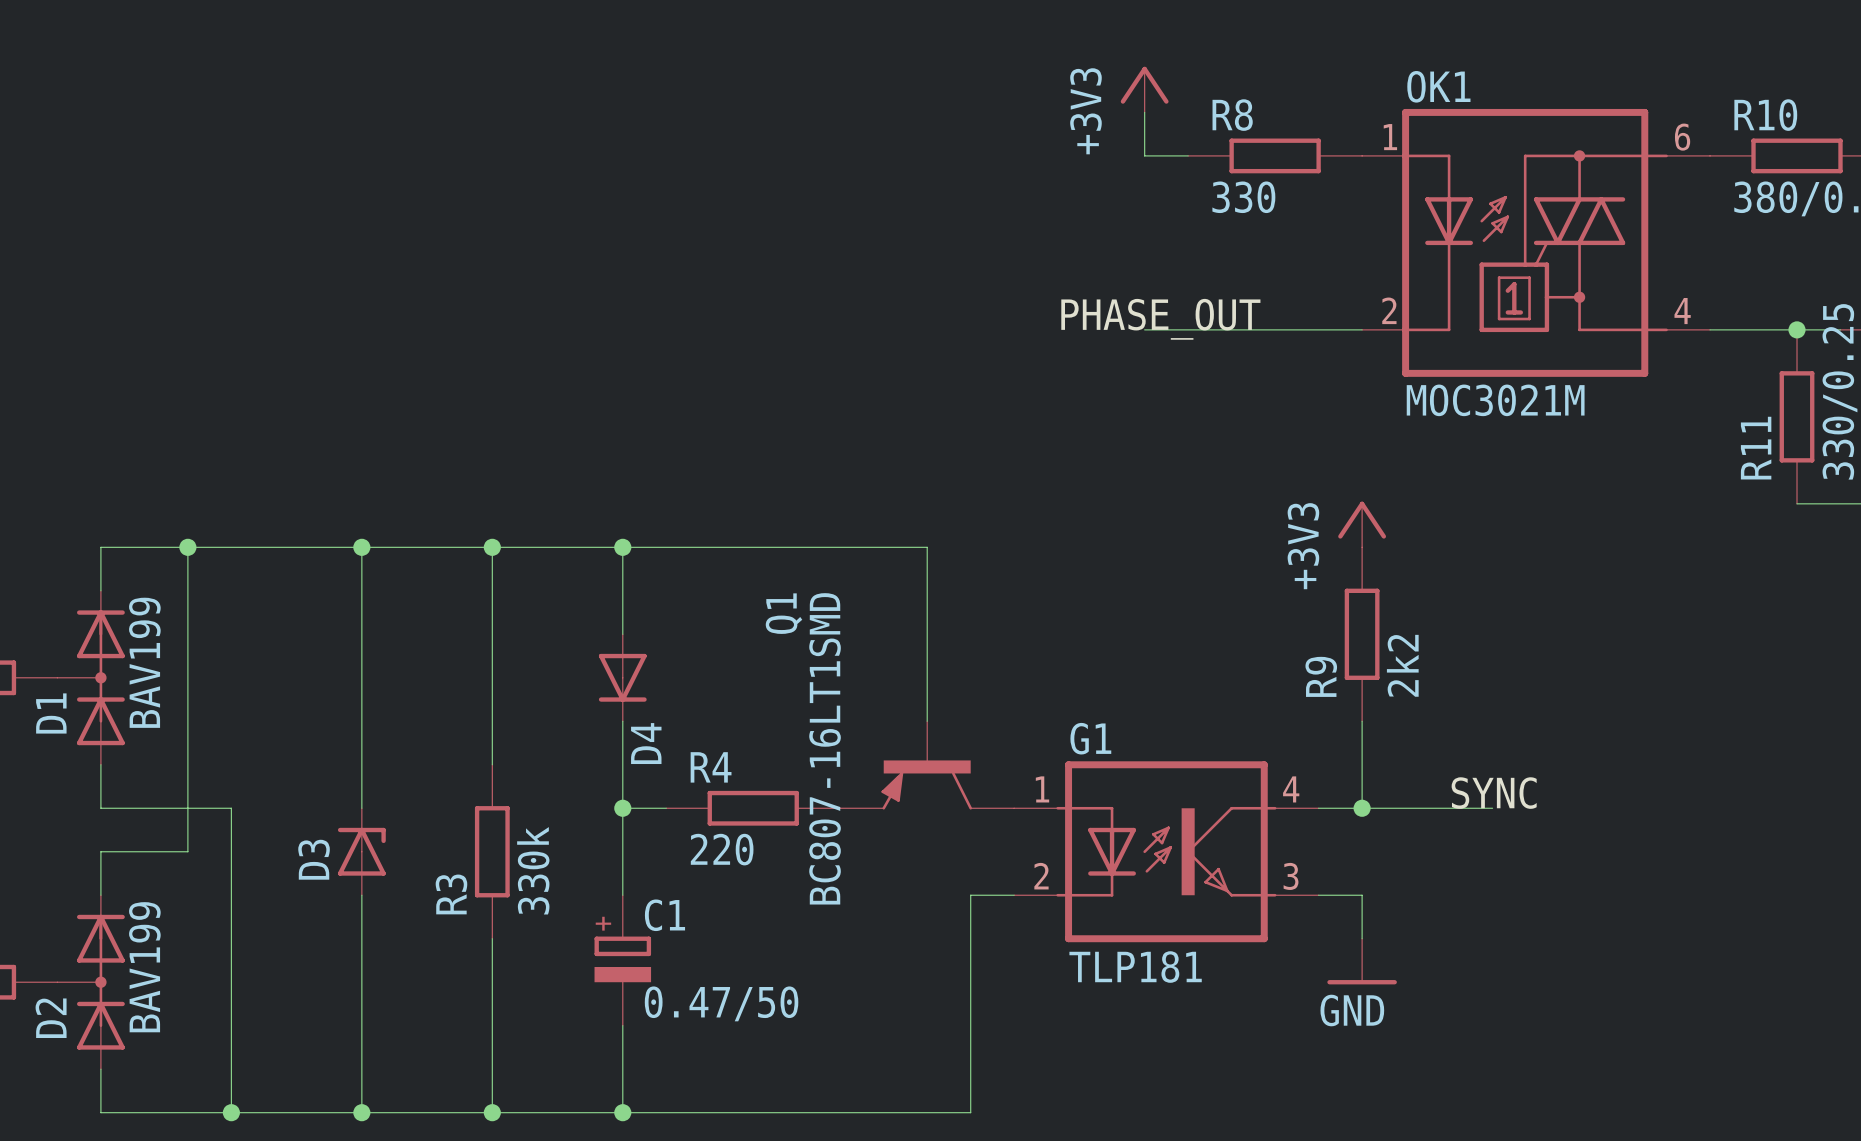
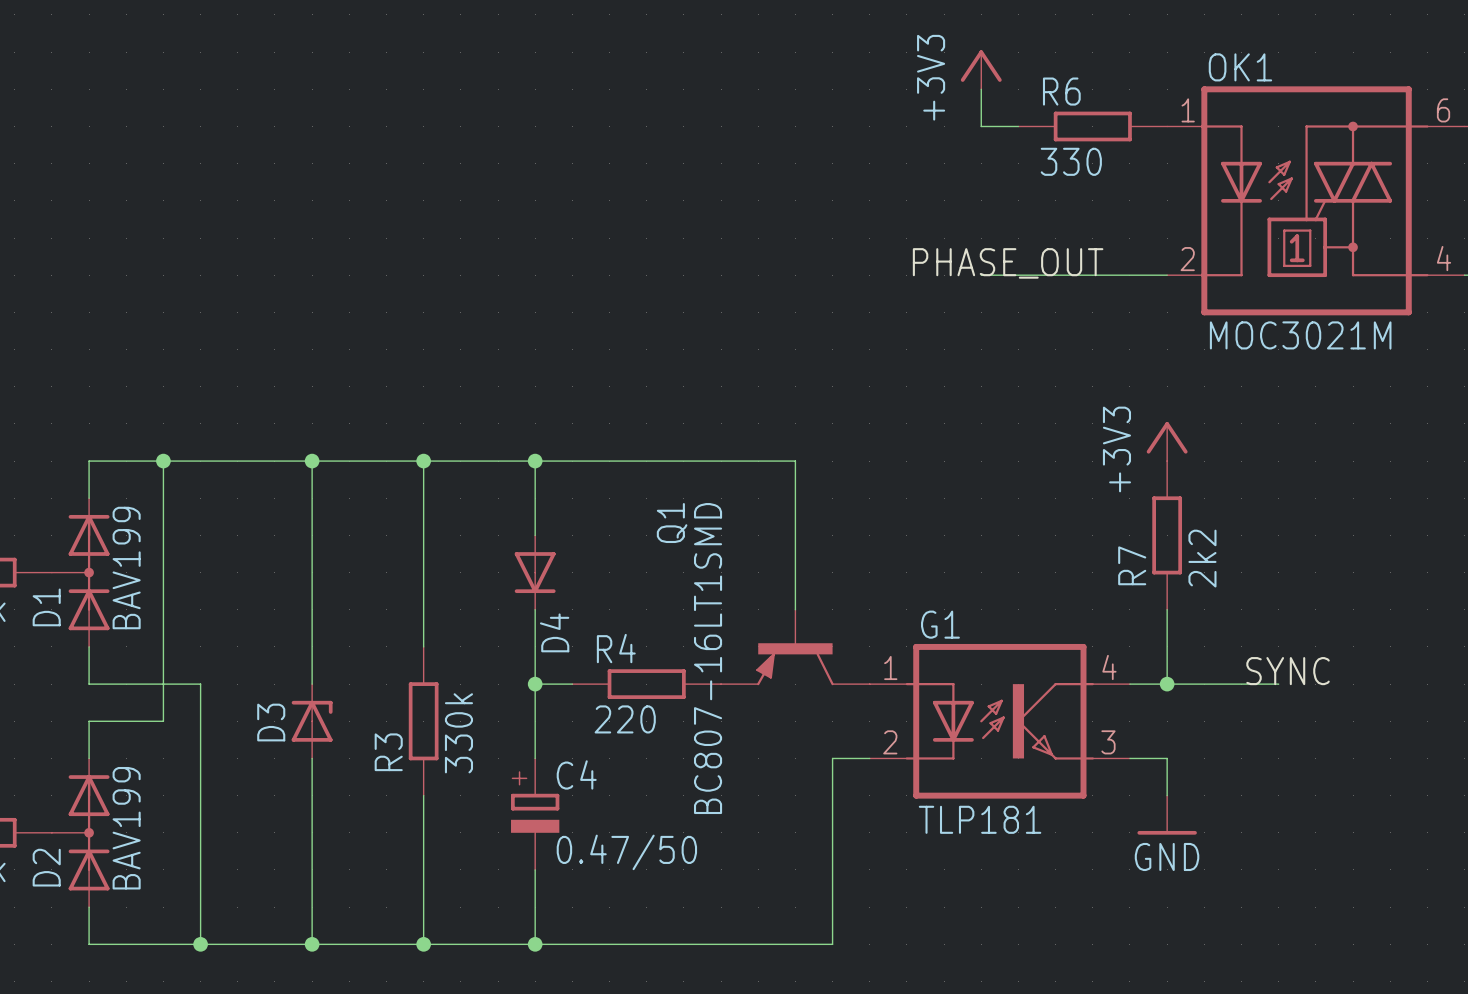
R8 name: R8 (1232, 115) -> R6 (1061, 91)
R9 name: R9 (1321, 676) -> R7 (1132, 565)
C1 name: C1 (664, 915) -> C4 (576, 774)

